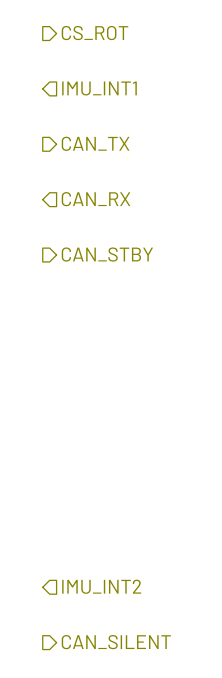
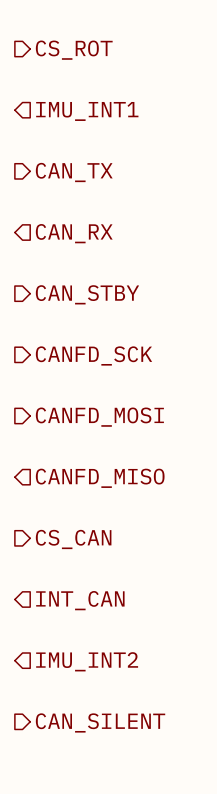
hierarchical label: none -> CANFD_SCK (93, 355)
hierarchical label: none -> CANFD_MOSI (99, 417)
hierarchical label: none -> CANFD_MISO (100, 478)
hierarchical label: none -> CS_CAN (73, 539)
hierarchical label: none -> INT_CAN (80, 600)

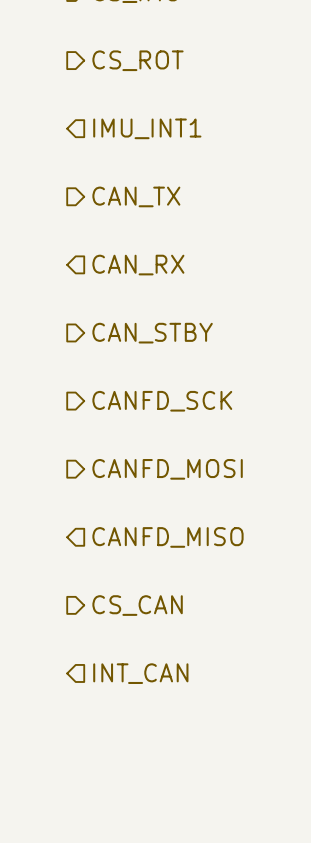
hierarchical label: IMU_INT2 (87, 661) -> none
hierarchical label: CAN_SILENT (100, 722) -> none

